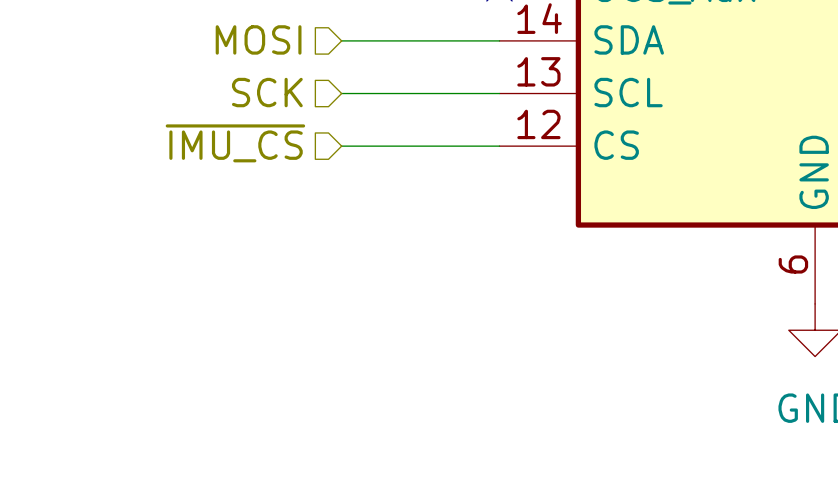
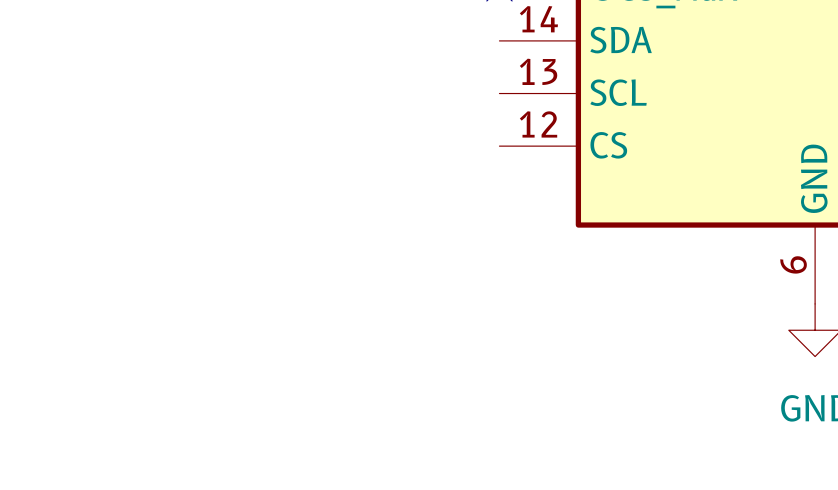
hierarchical label: MOSI (258, 39) -> none
wire: (341, 40) (499, 40) -> none
hierarchical label: SCK (267, 92) -> none
wire: (341, 93) (499, 93) -> none
hierarchical label: ~{IMU_CS} (235, 143) -> none
wire: (341, 146) (499, 146) -> none

